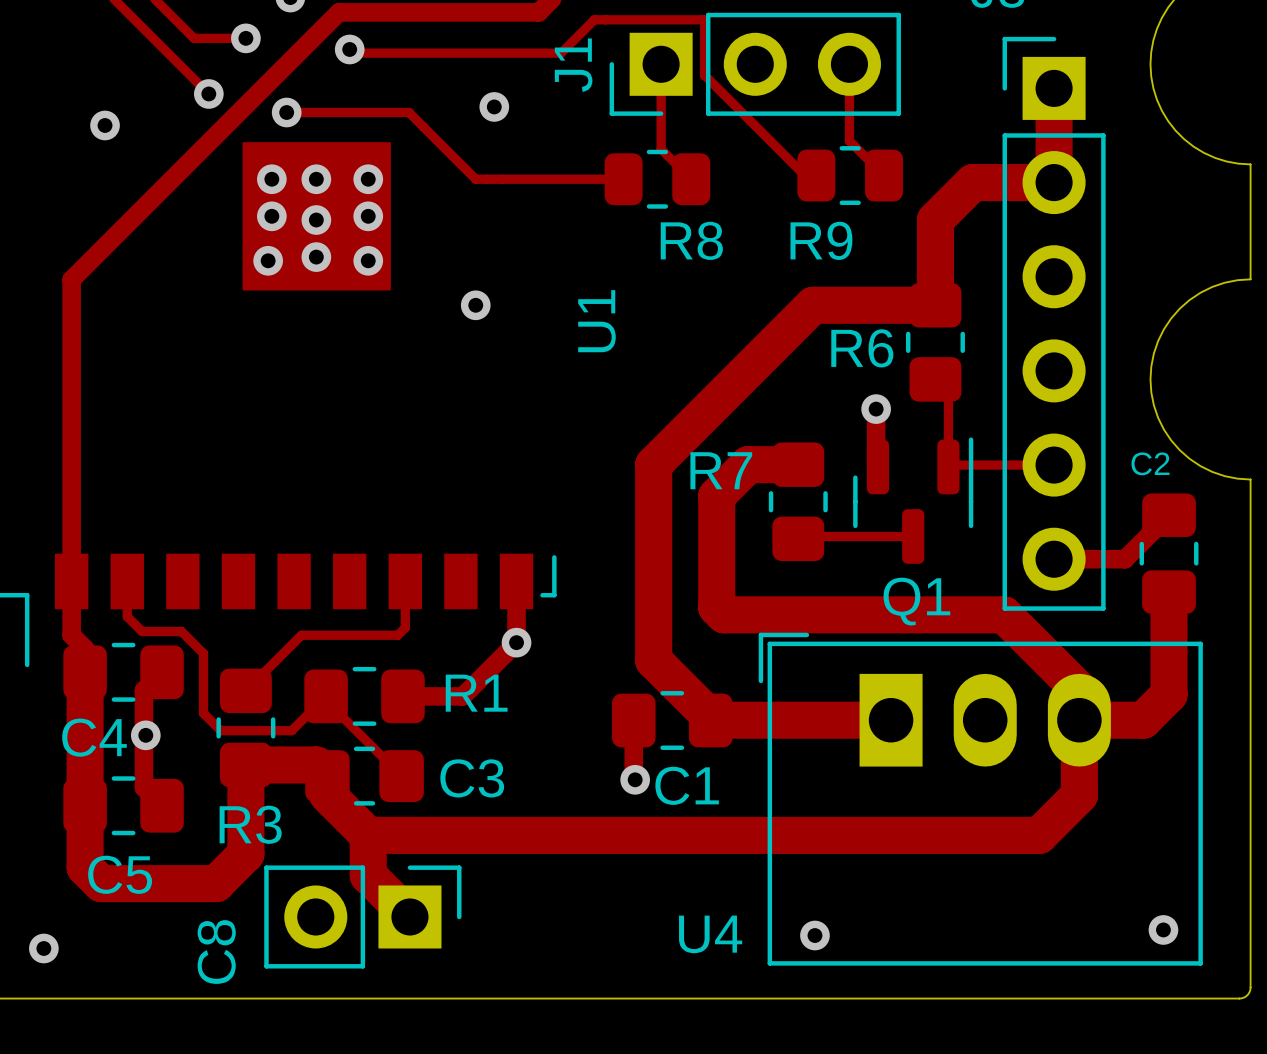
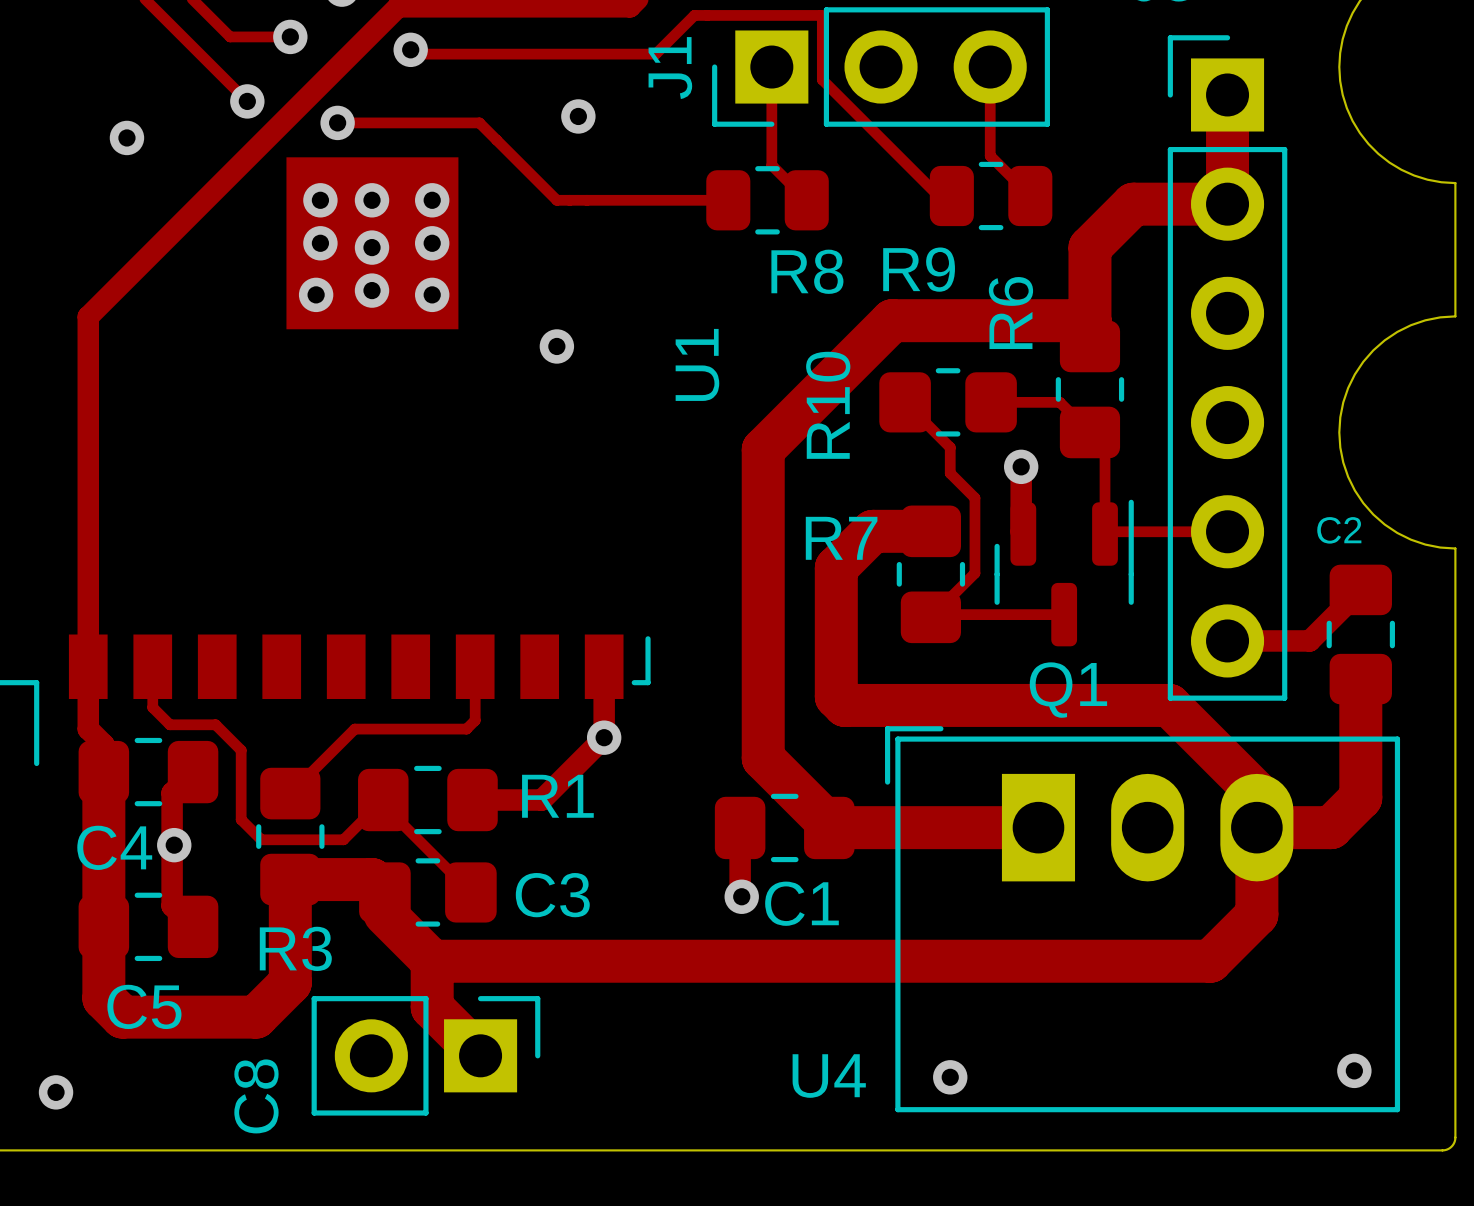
R9 name position: R9 (821, 240) -> R9 (919, 269)
track: (935, 305) (813, 305) (653, 464) -> (1089, 320) (892, 320) (763, 449) (763, 531)
R6 name rotation: 0° (862, 348) -> 90° counterclockwise (1010, 313)
track: none -> (905, 402) (950, 447) (950, 473) (974, 498) (974, 573) (933, 614)
R10: none -> (948, 402)
track: none -> (991, 402) (1059, 402) (1089, 432)

